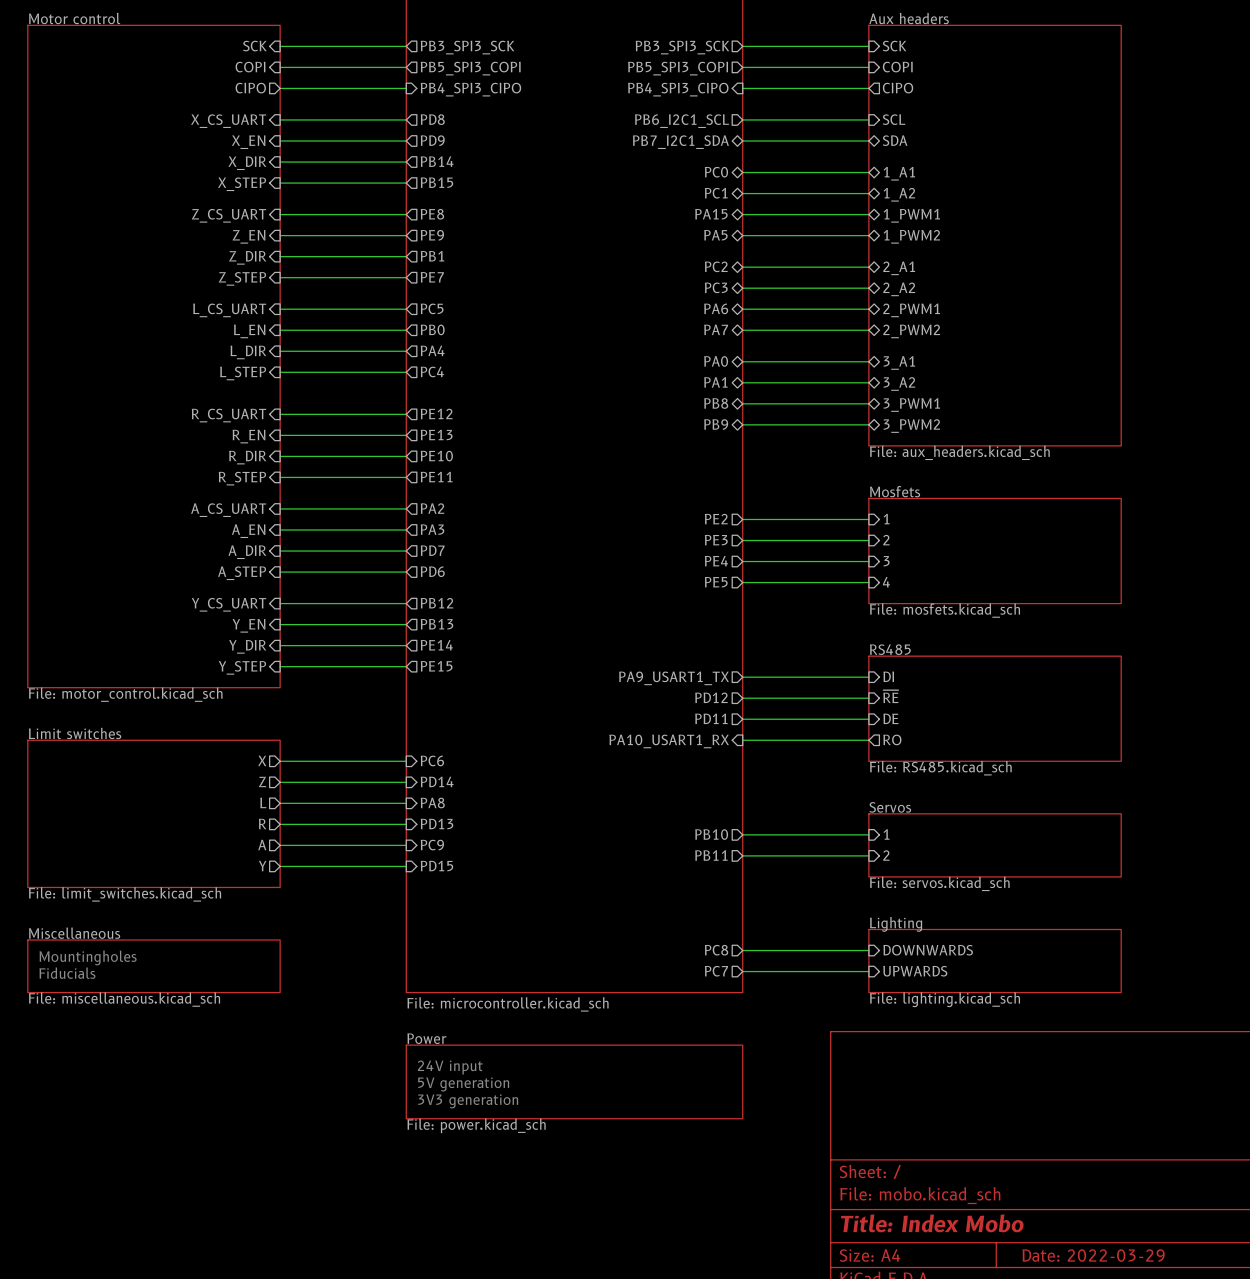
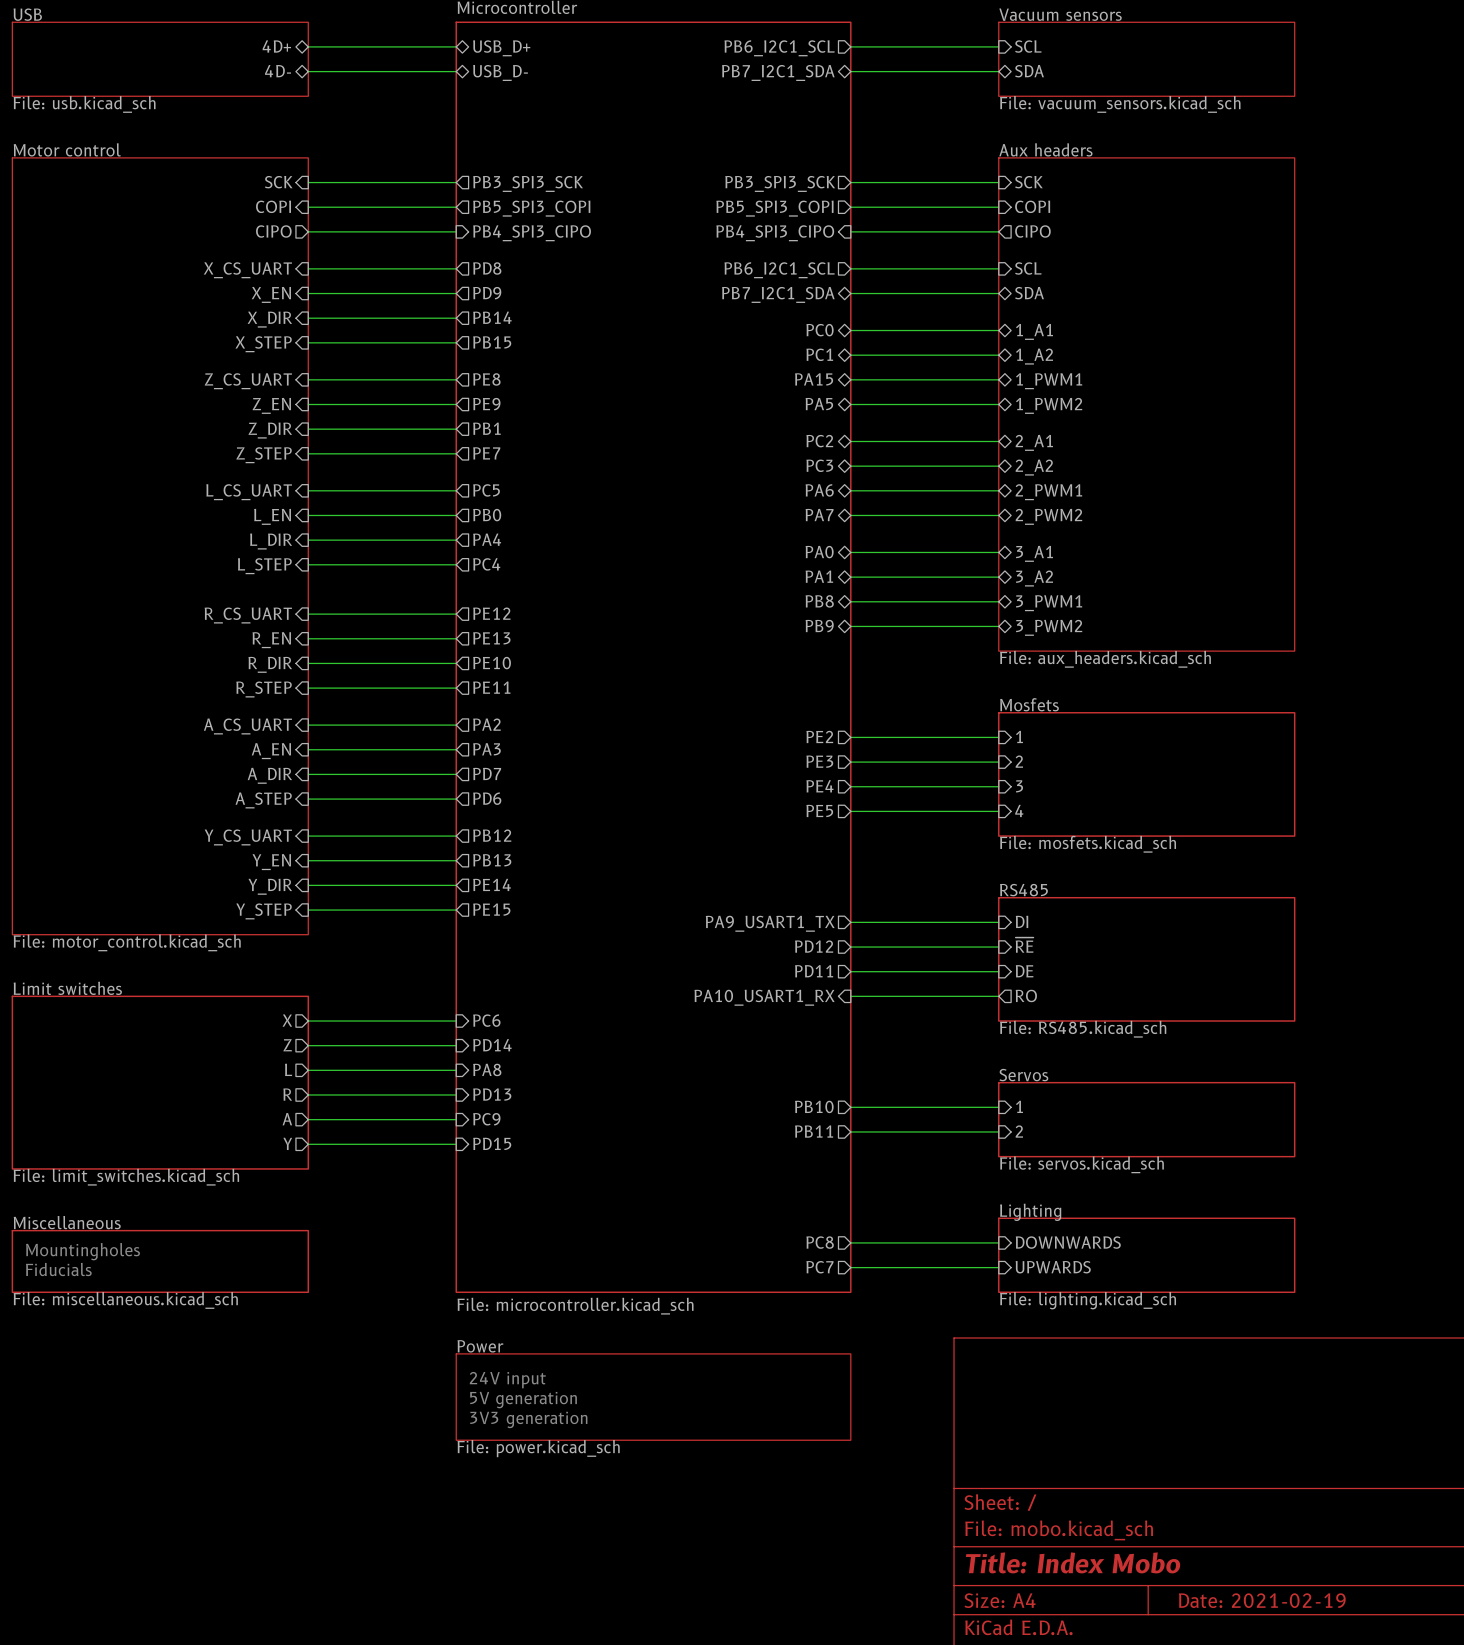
title block: Date: 2022-03-29 (1093, 1255) -> Date: 2021-02-19 (1262, 1600)

